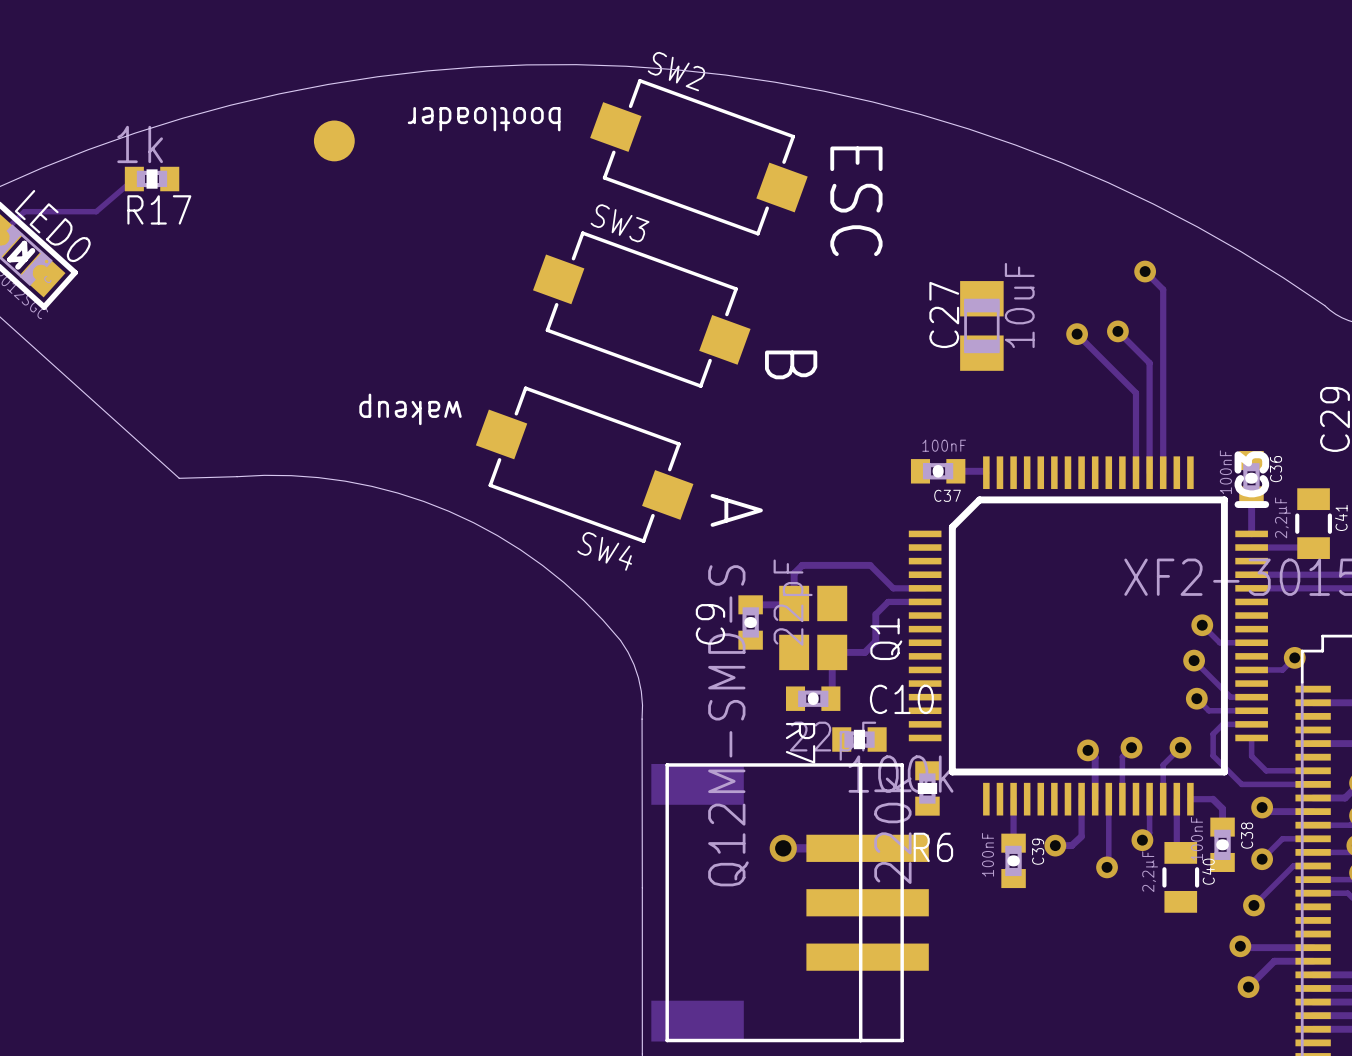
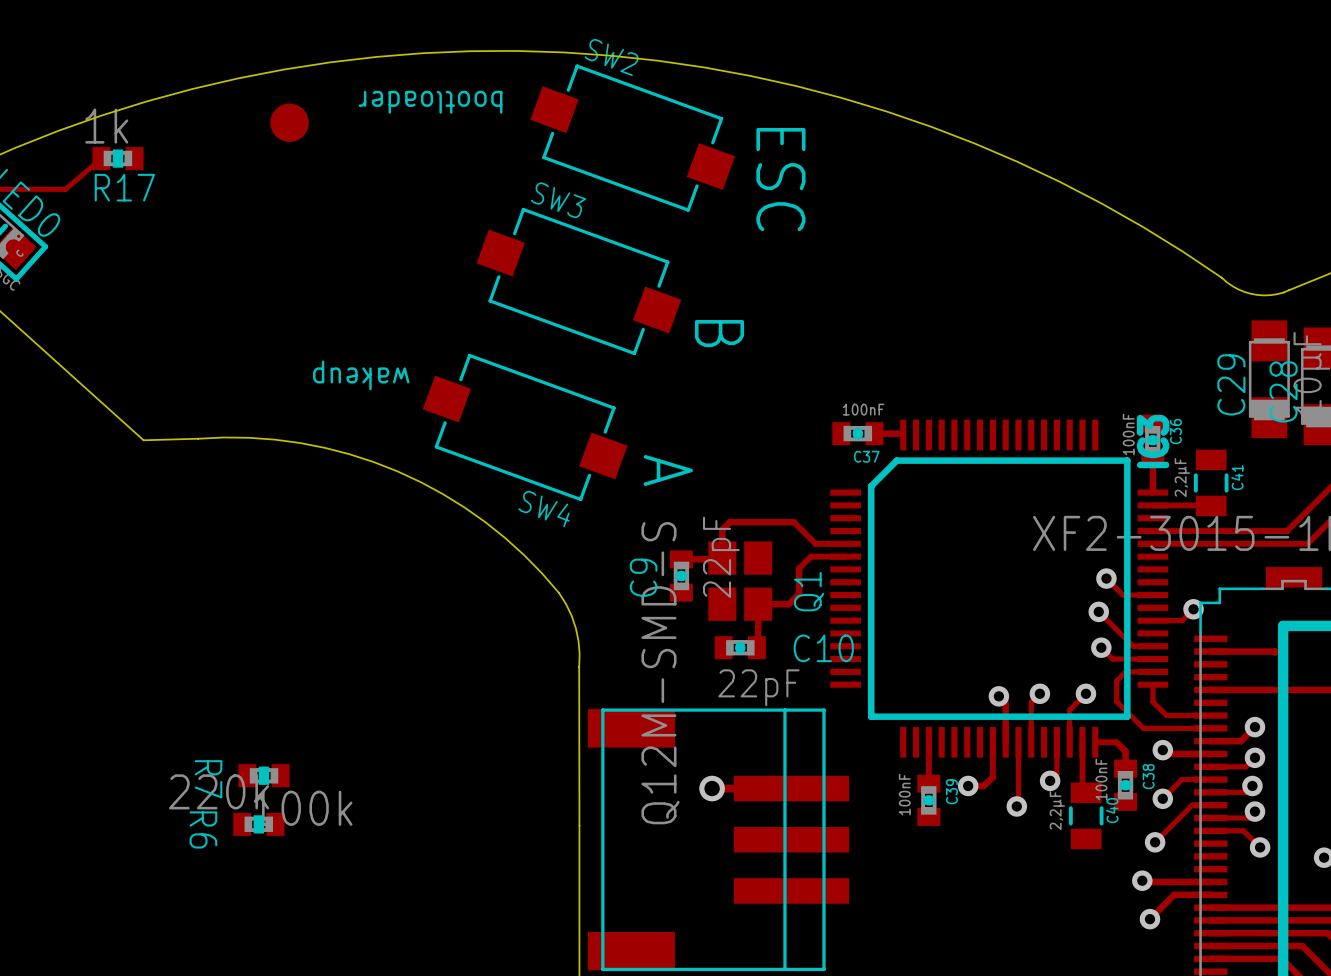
track: (1145, 271) (1163, 289) (1163, 472) -> none
via: (1145, 271) -> none
C27: 10uF (981, 325) -> none
track: (1117, 331) (1149, 363) (1149, 472) -> none
via: (1117, 331) -> none
track: (1077, 334) (1135, 393) (1135, 472) -> none
via: (1077, 334) -> none
R7 position: (859, 739) -> (263, 775)
R6 rotation: 0° (927, 788) -> 90° clockwise (258, 824)
R6 position: (927, 788) -> (258, 824)

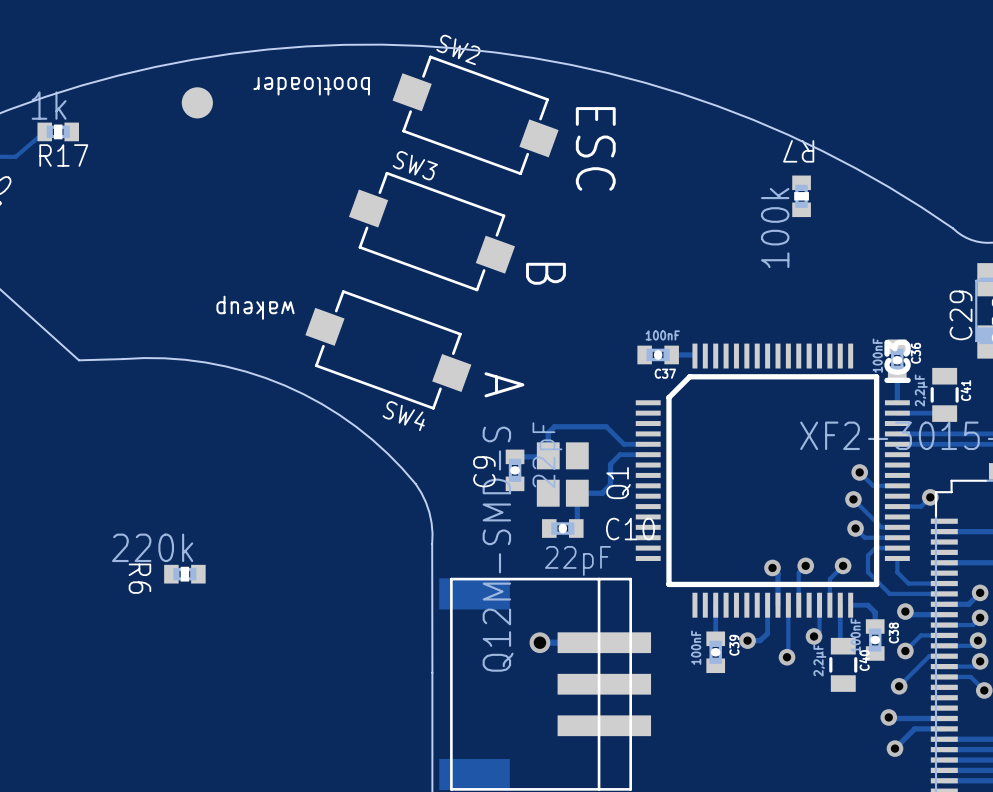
R7 rotation: 0° (263, 775) -> 90° clockwise (801, 196)
R7 position: (263, 775) -> (801, 196)
R6 position: (258, 824) -> (184, 574)

